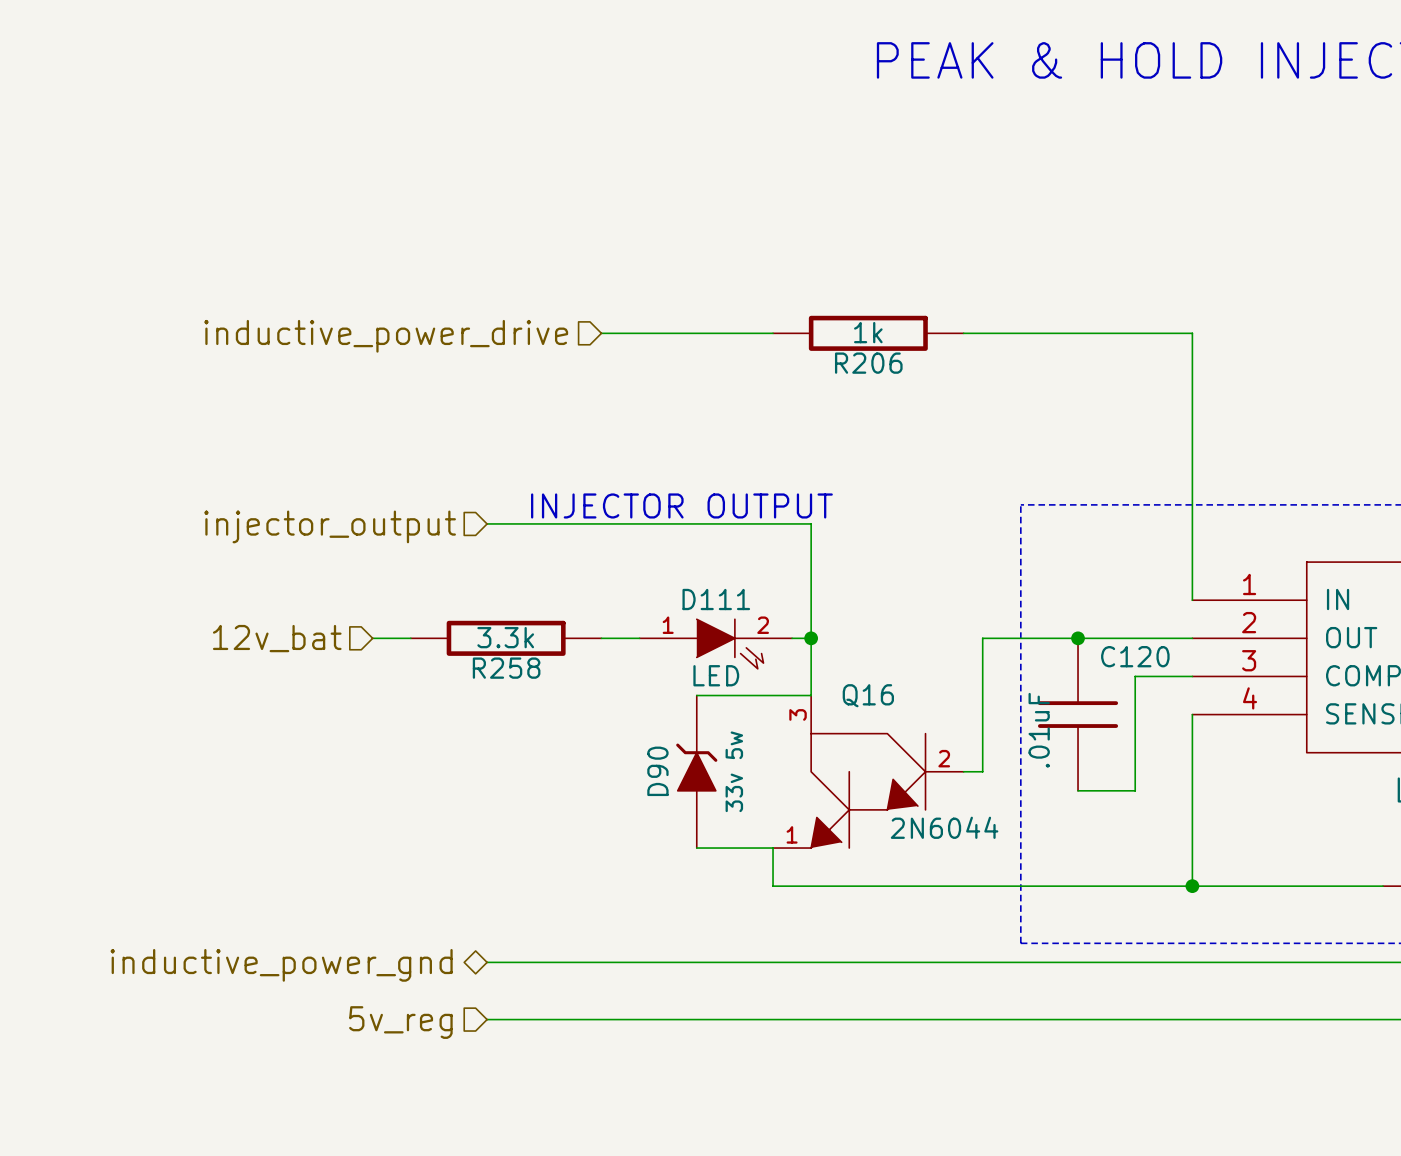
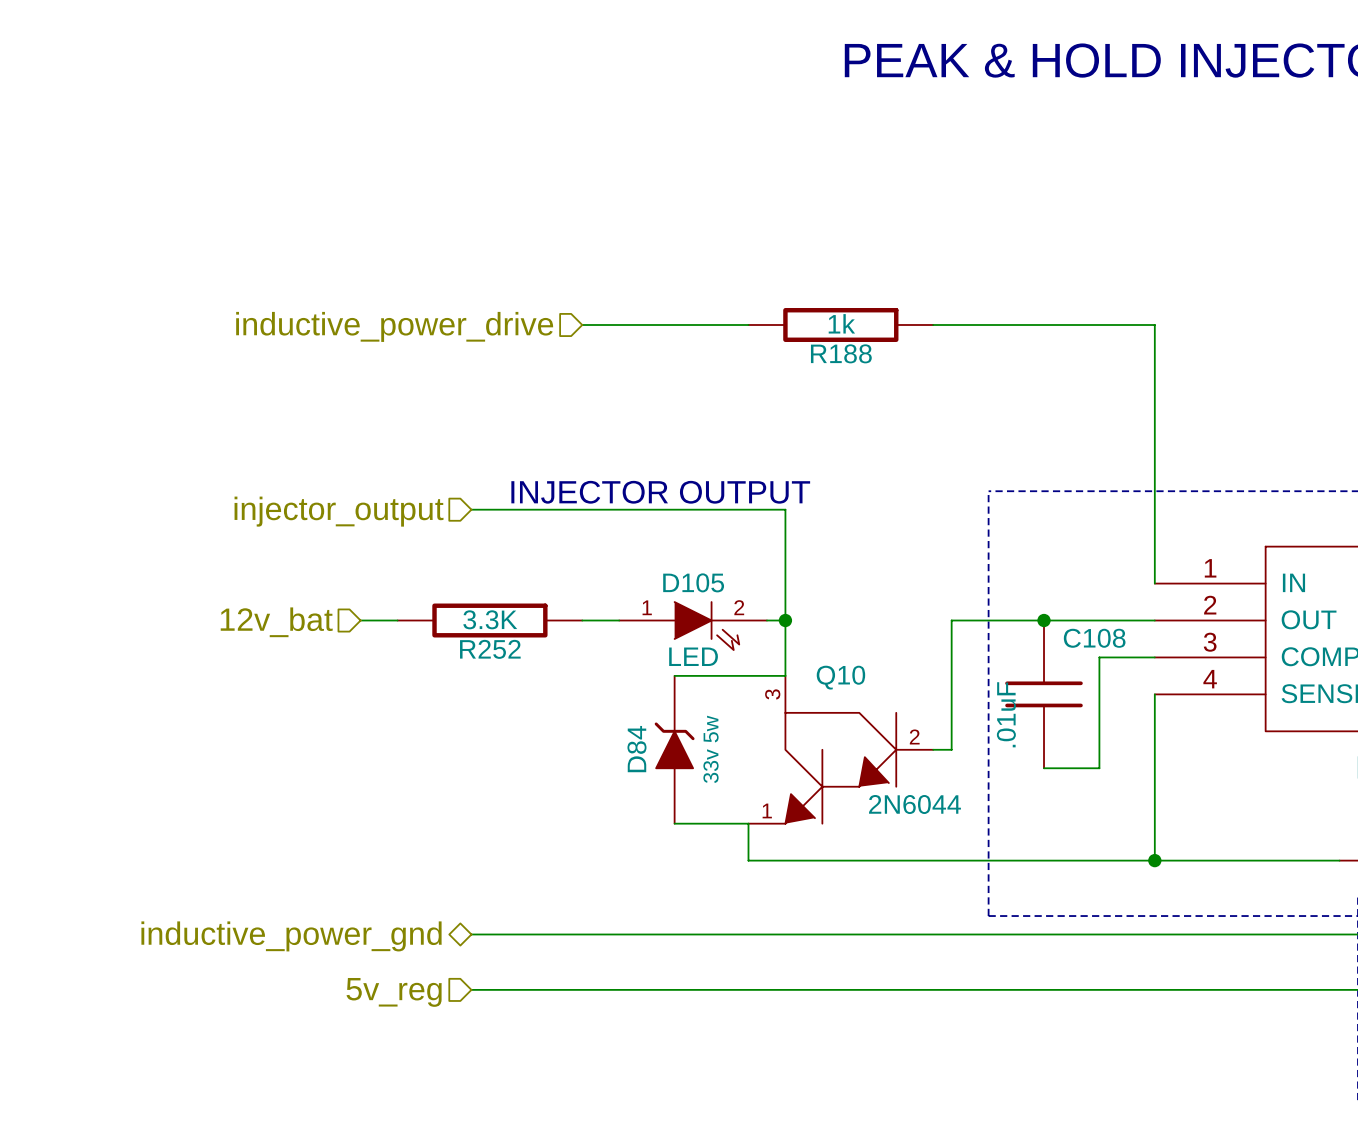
R206 name: R206 (868, 363) -> R188 (841, 353)
D111 name: D111 (716, 599) -> D105 (693, 582)
R258 value: 3.3k (505, 637) -> 3.3K (490, 619)
C120 name: C120 (1135, 656) -> C108 (1094, 638)
R258 name: R258 (506, 668) -> R252 (490, 649)
Q16 name: Q16 (868, 695) -> Q10 (840, 677)
D90 name: D90 (657, 771) -> D84 (636, 749)

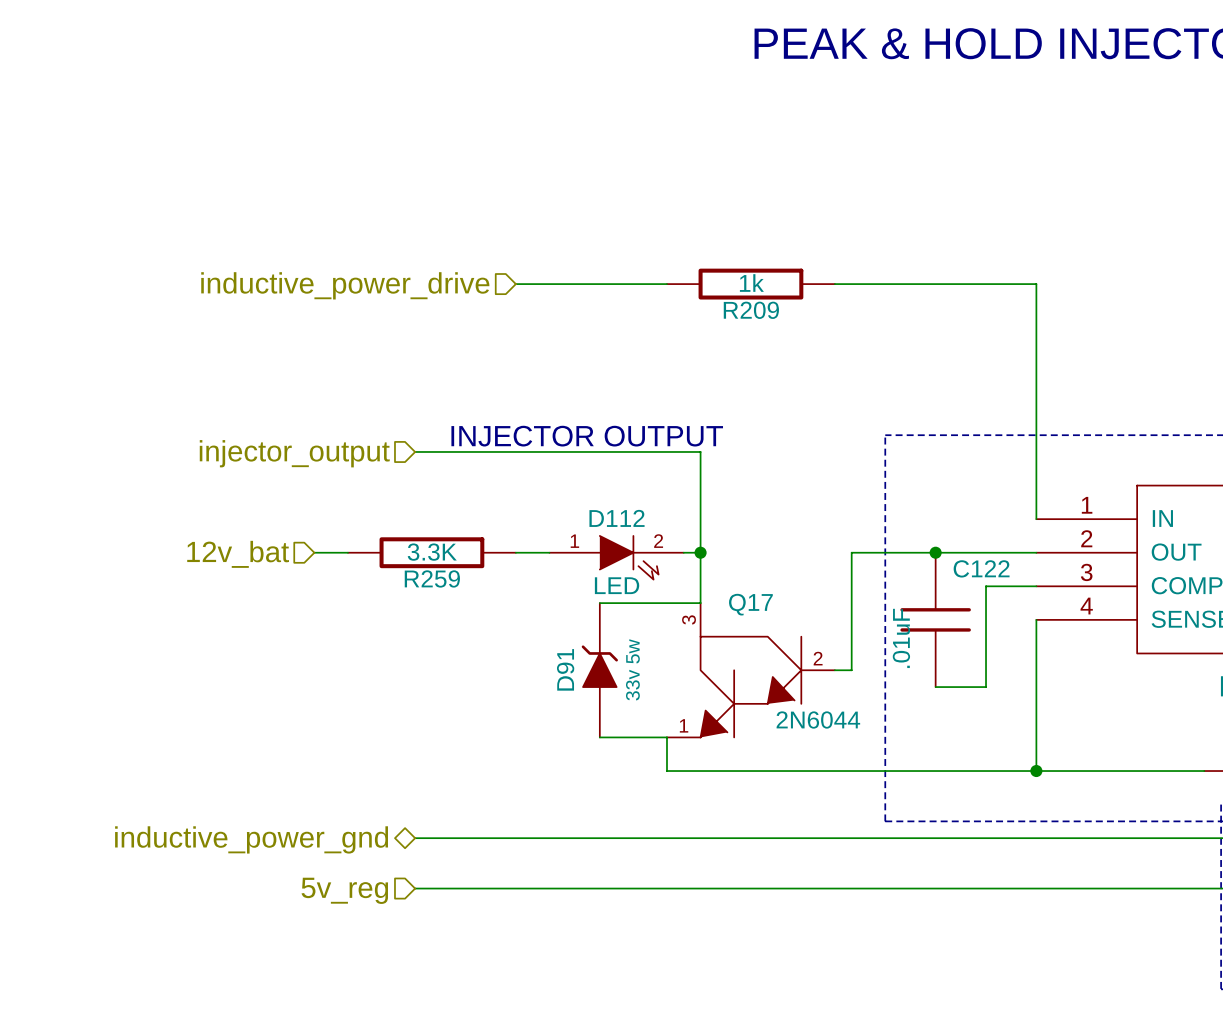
R188 name: R188 (841, 353) -> R209 (751, 310)
D105 name: D105 (693, 582) -> D112 (617, 518)
C108 name: C108 (1094, 638) -> C122 (981, 568)
R252 name: R252 (490, 649) -> R259 (432, 578)
Q10 name: Q10 (840, 677) -> Q17 (750, 604)
D84 name: D84 (636, 749) -> D91 (565, 669)

